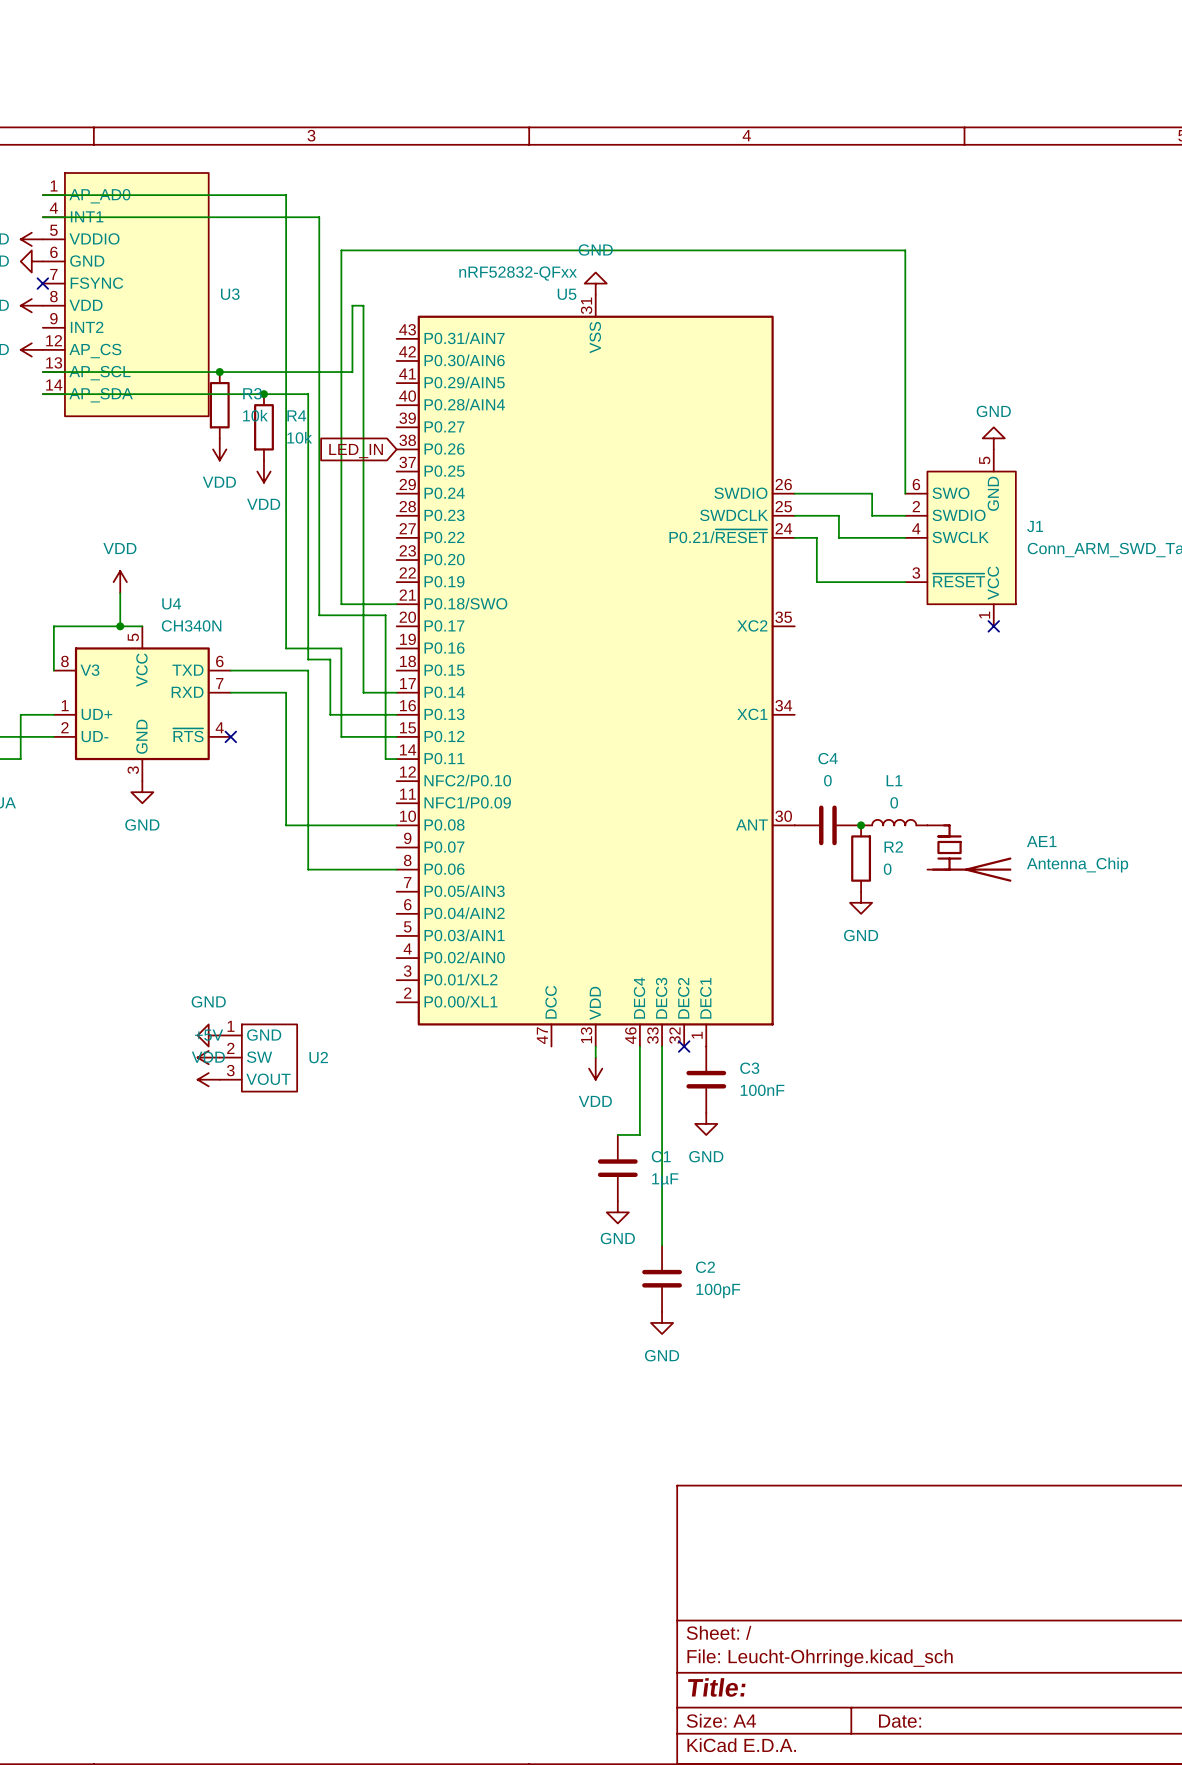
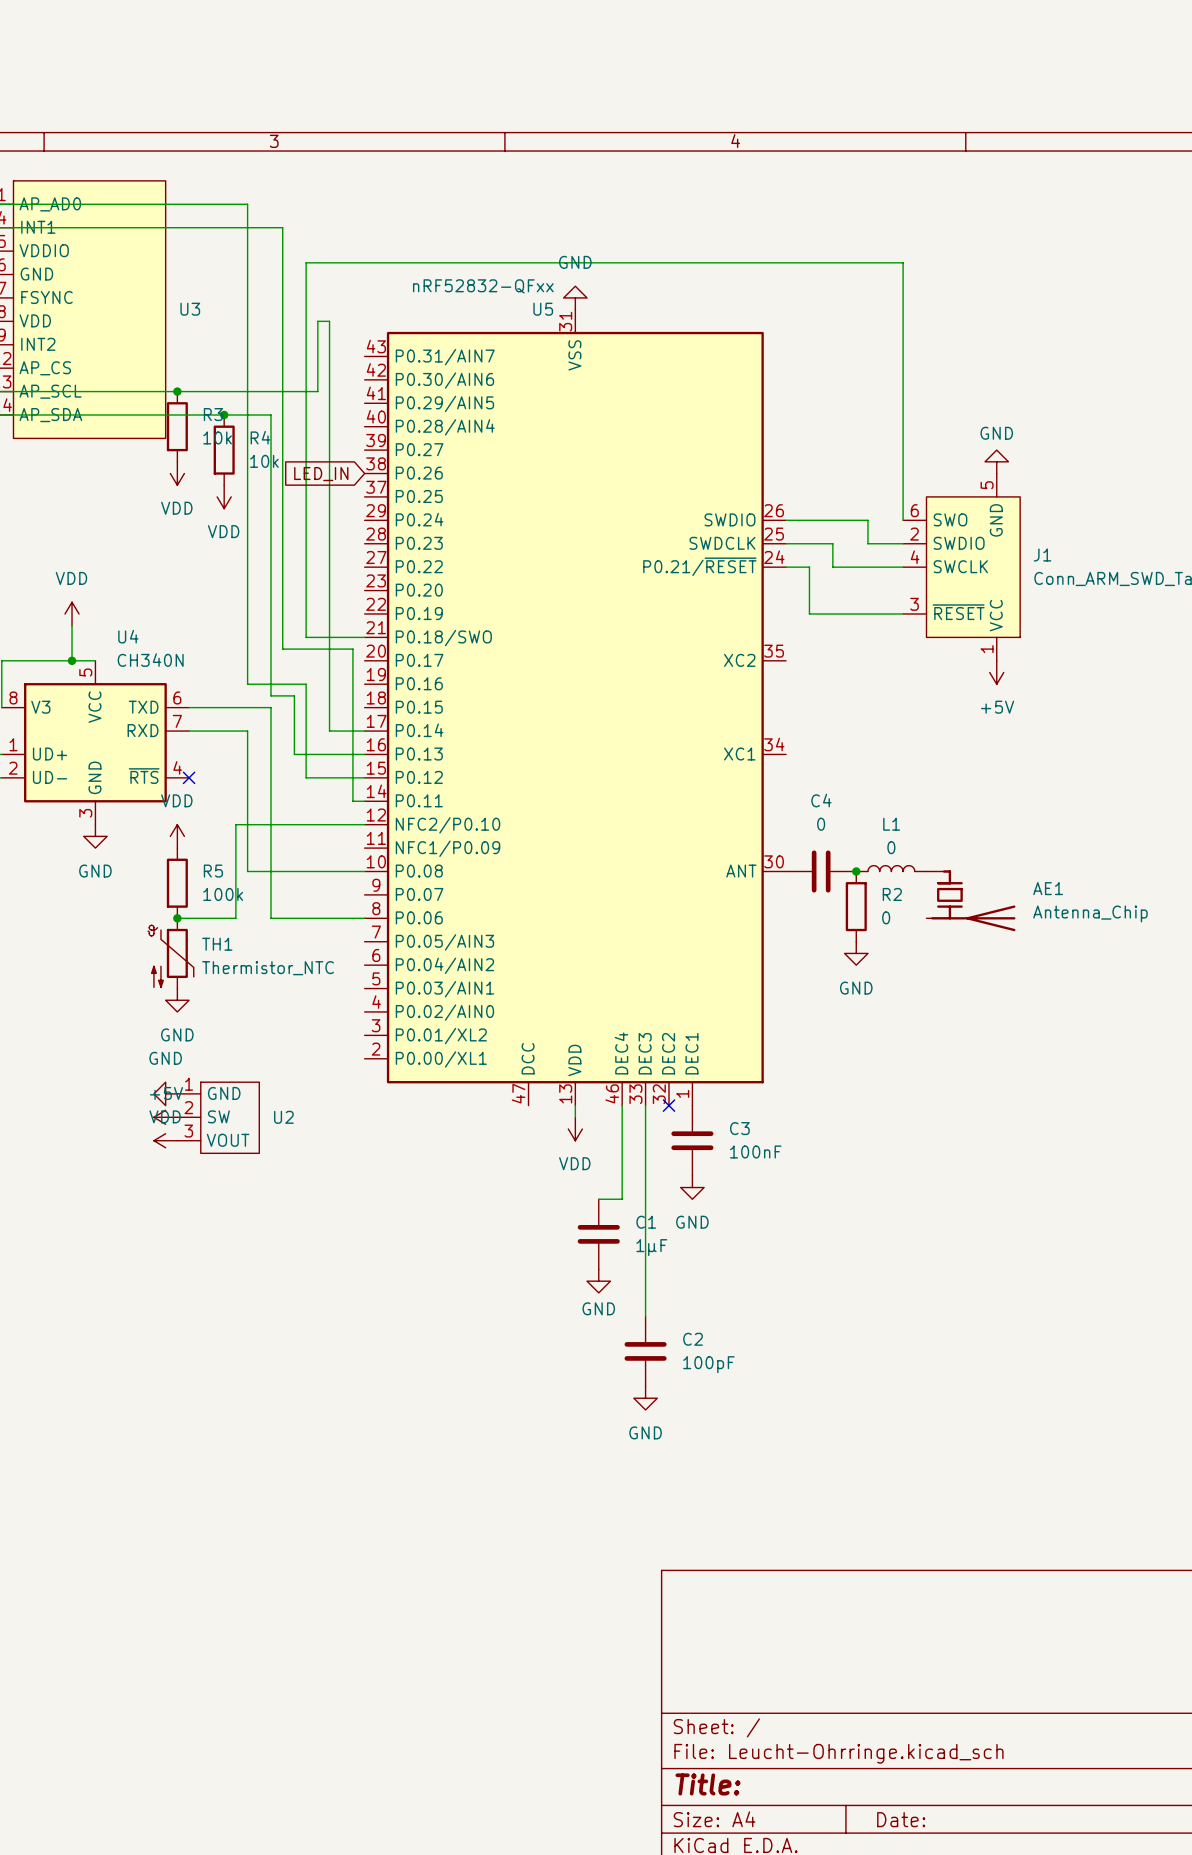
no-connect mark: (993, 626) -> none
power symbol: none -> +5V (996, 672)
wire: none -> (364, 824) (235, 824) (235, 918) (177, 918)
power symbol: none -> VDD (177, 836)
R5: none -> 100k (177, 883)
junction: none -> (177, 918)
TH1: none -> Thermistor_NTC (170, 953)
power symbol: none -> GND (177, 1000)

